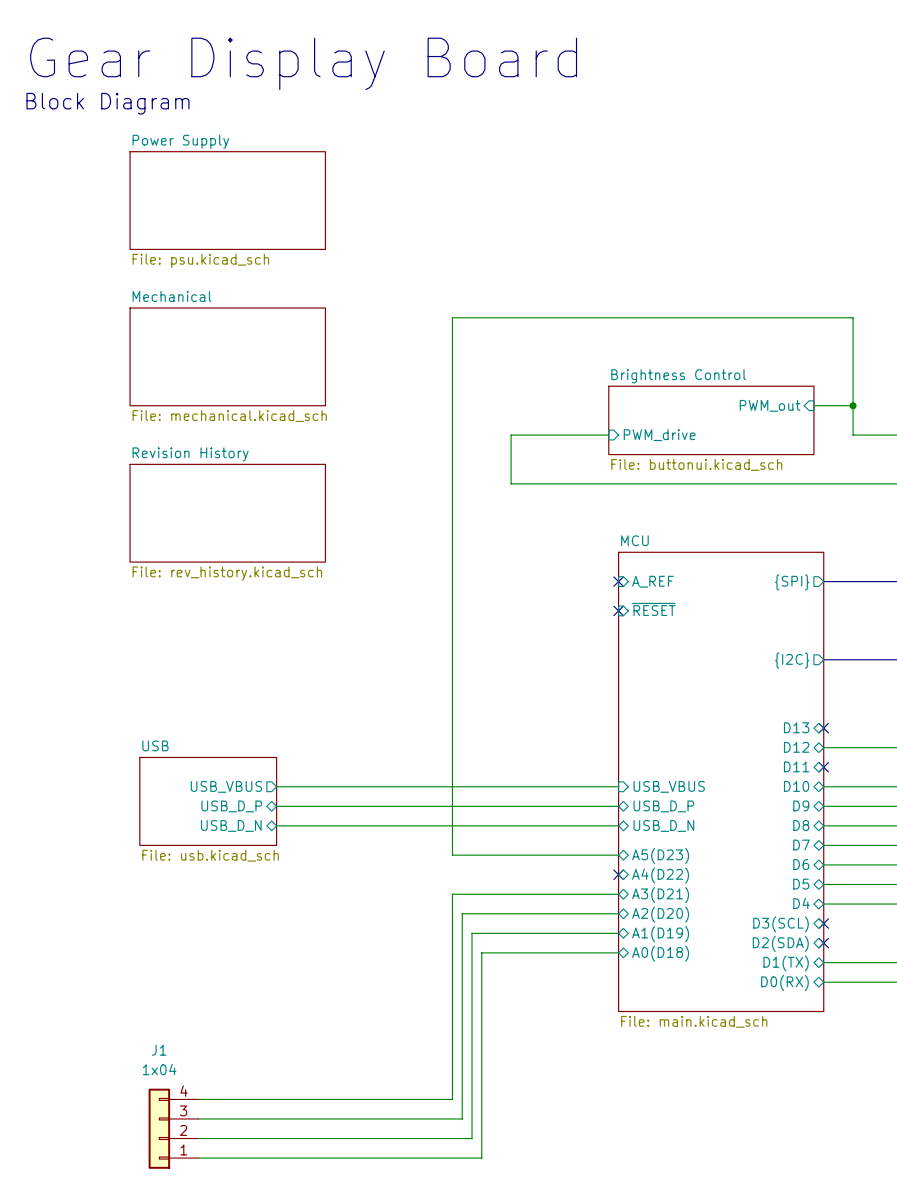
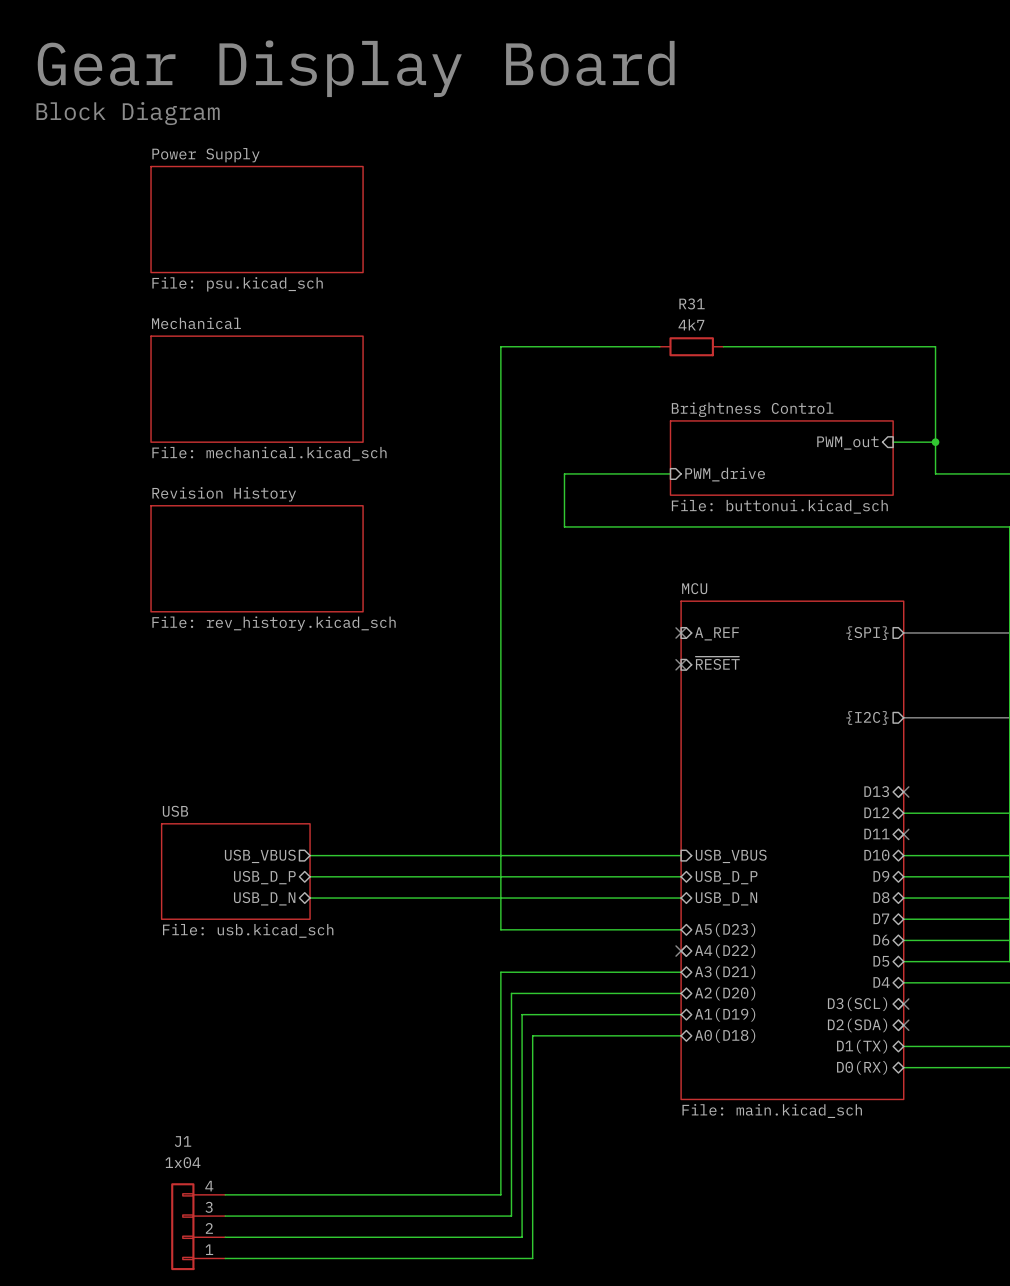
wire: (599, 317) (657, 317) -> none
R31: none -> (691, 346)

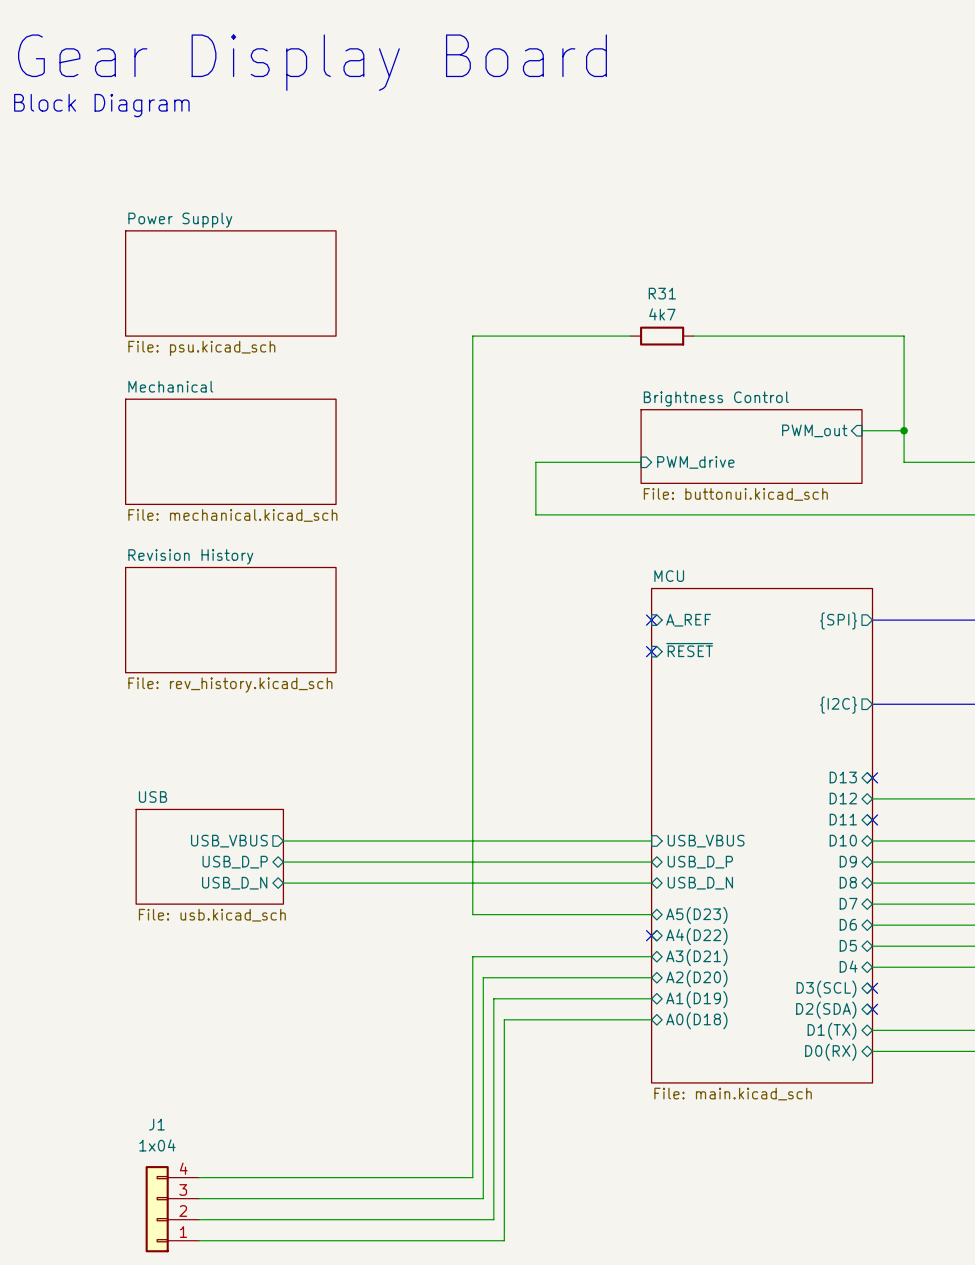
sheet Power Supply position: (257, 219) -> (230, 283)
sheet Mechanical position: (257, 389) -> (230, 451)
sheet Revision History position: (257, 558) -> (230, 620)

